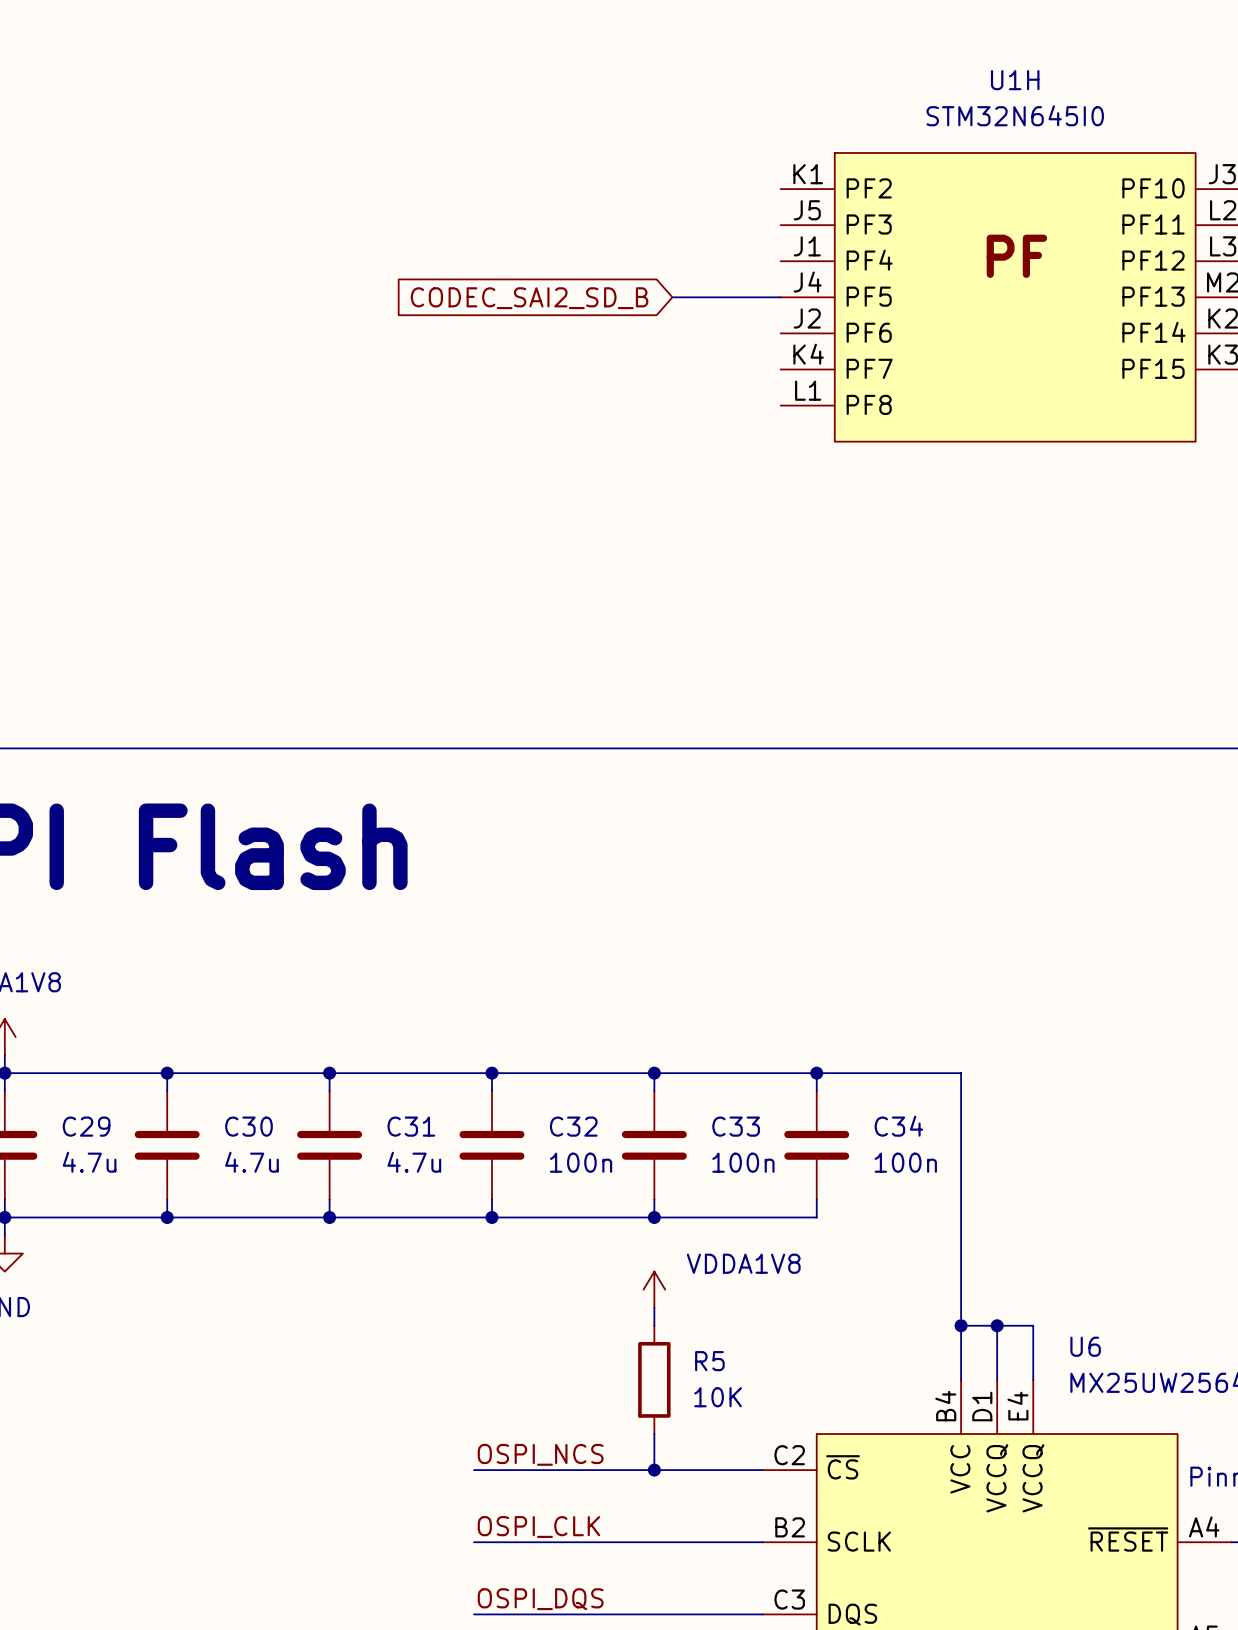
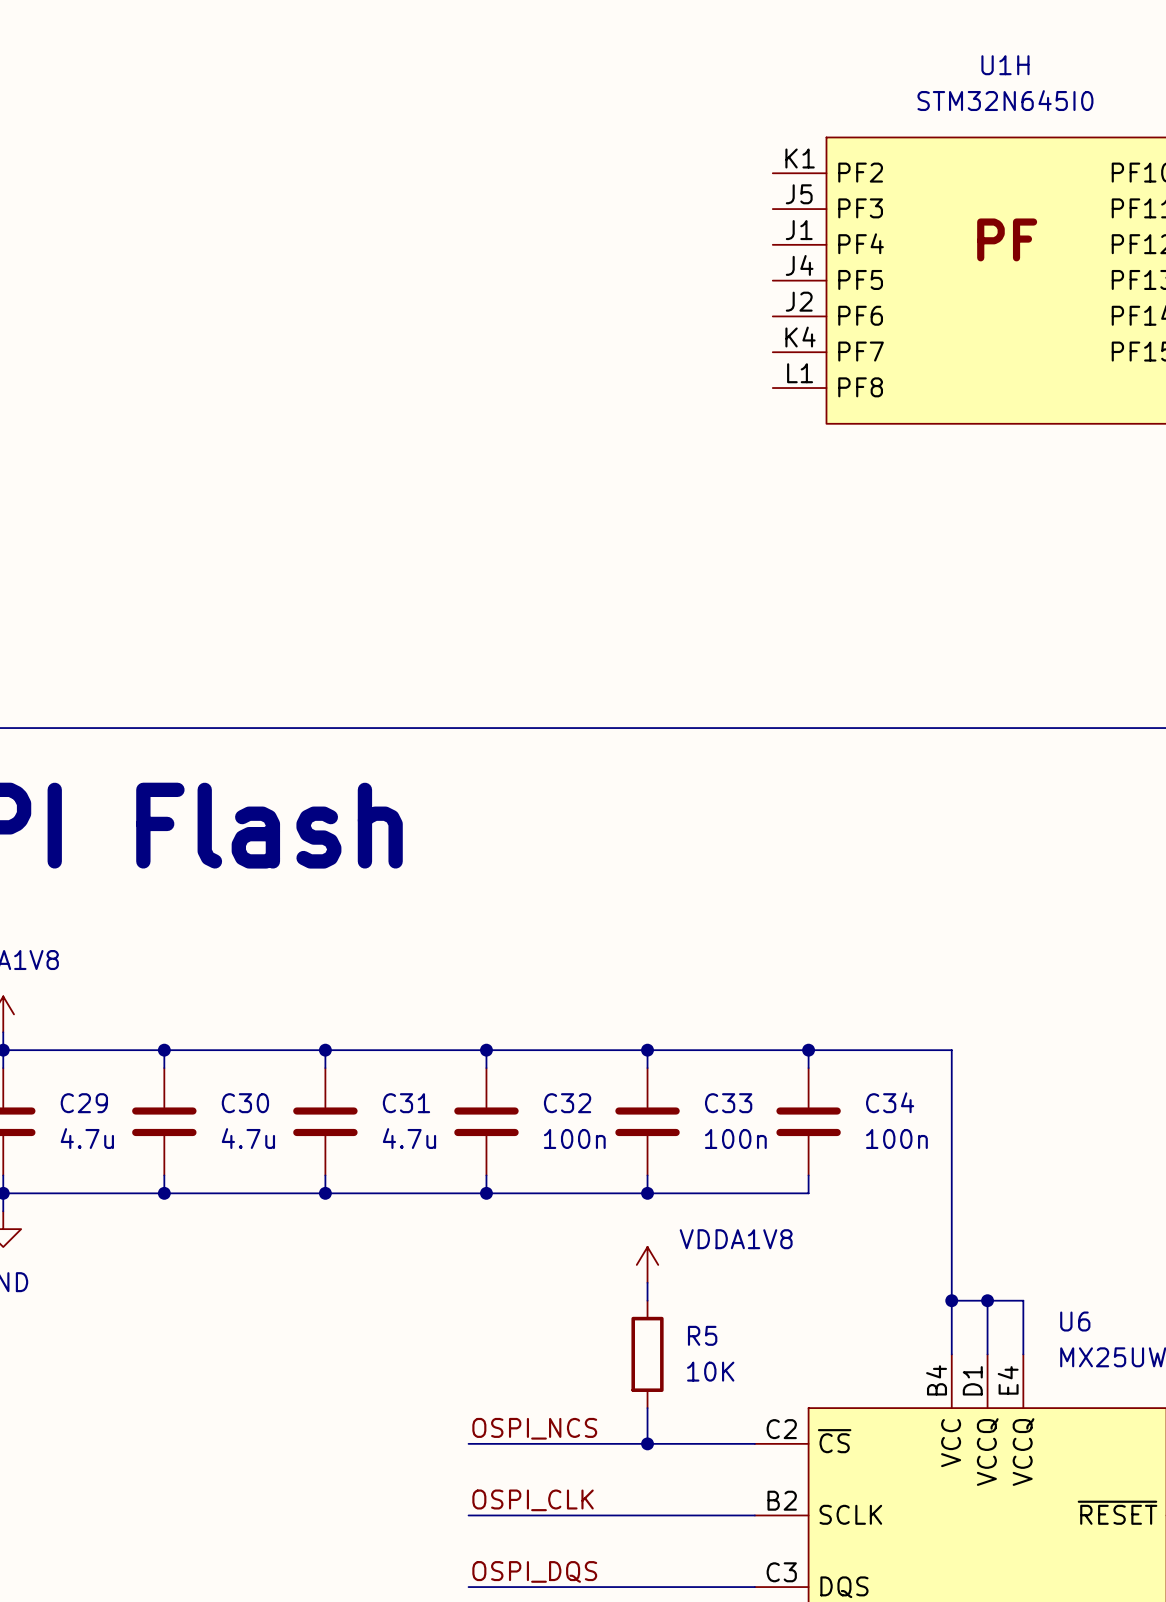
wire: (672, 297) (780, 297) -> none
global label: CODEC_SAI2_SD_B (529, 298) -> none

